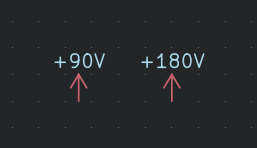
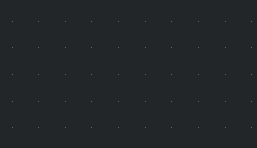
power symbol: +90V (78, 87) -> none
power symbol: +180V (171, 87) -> none

